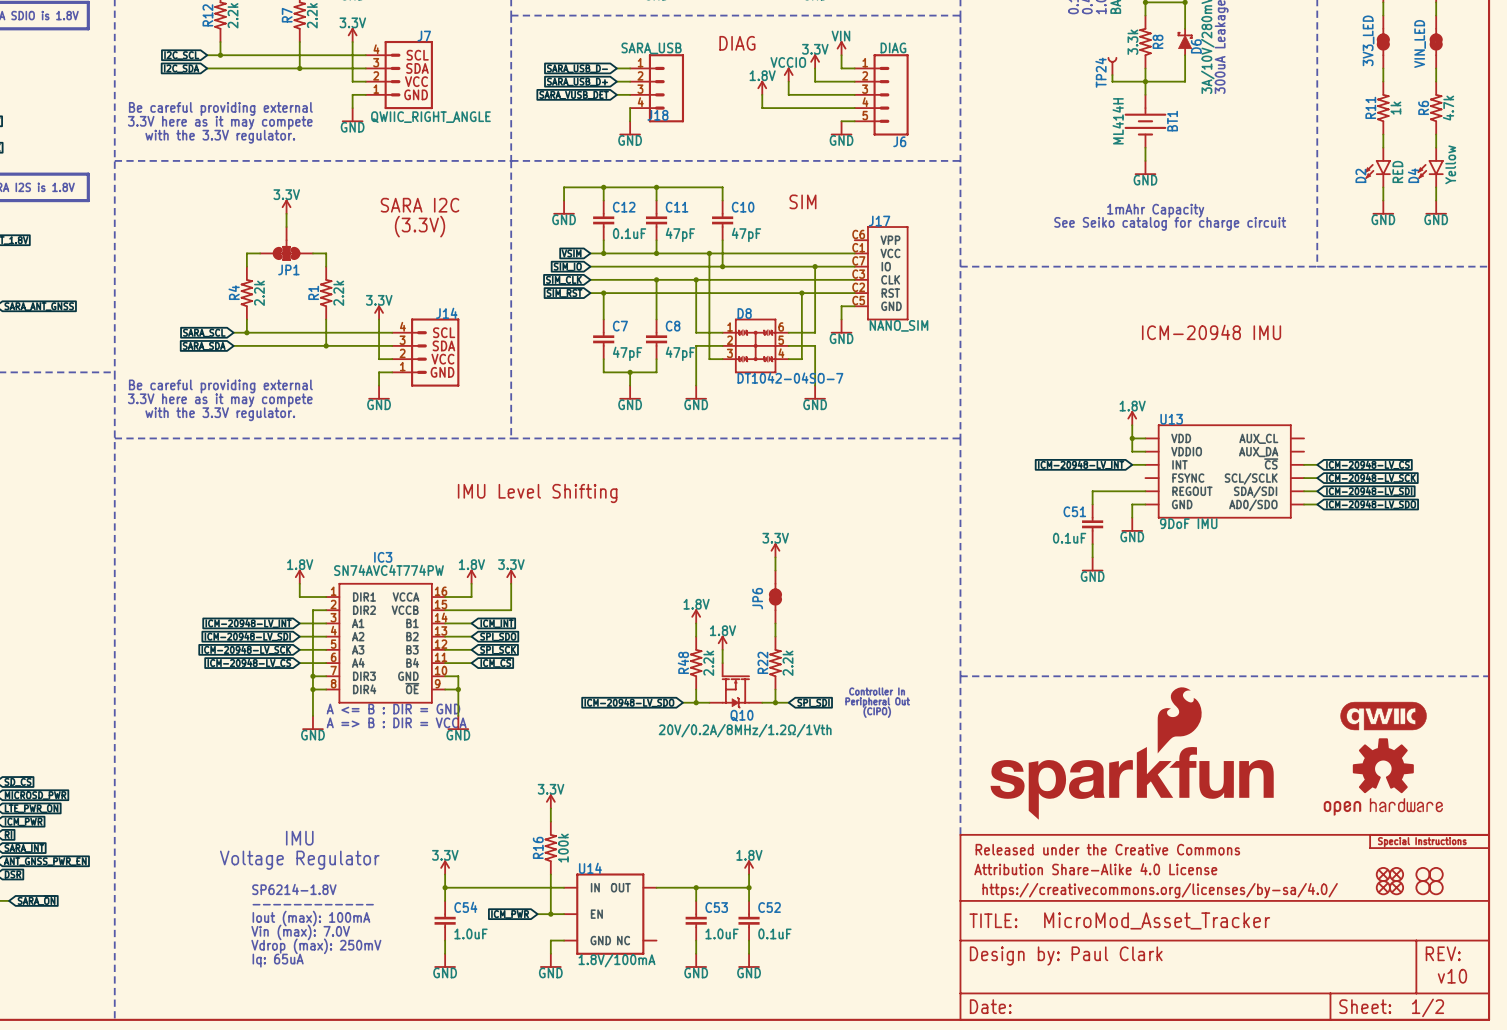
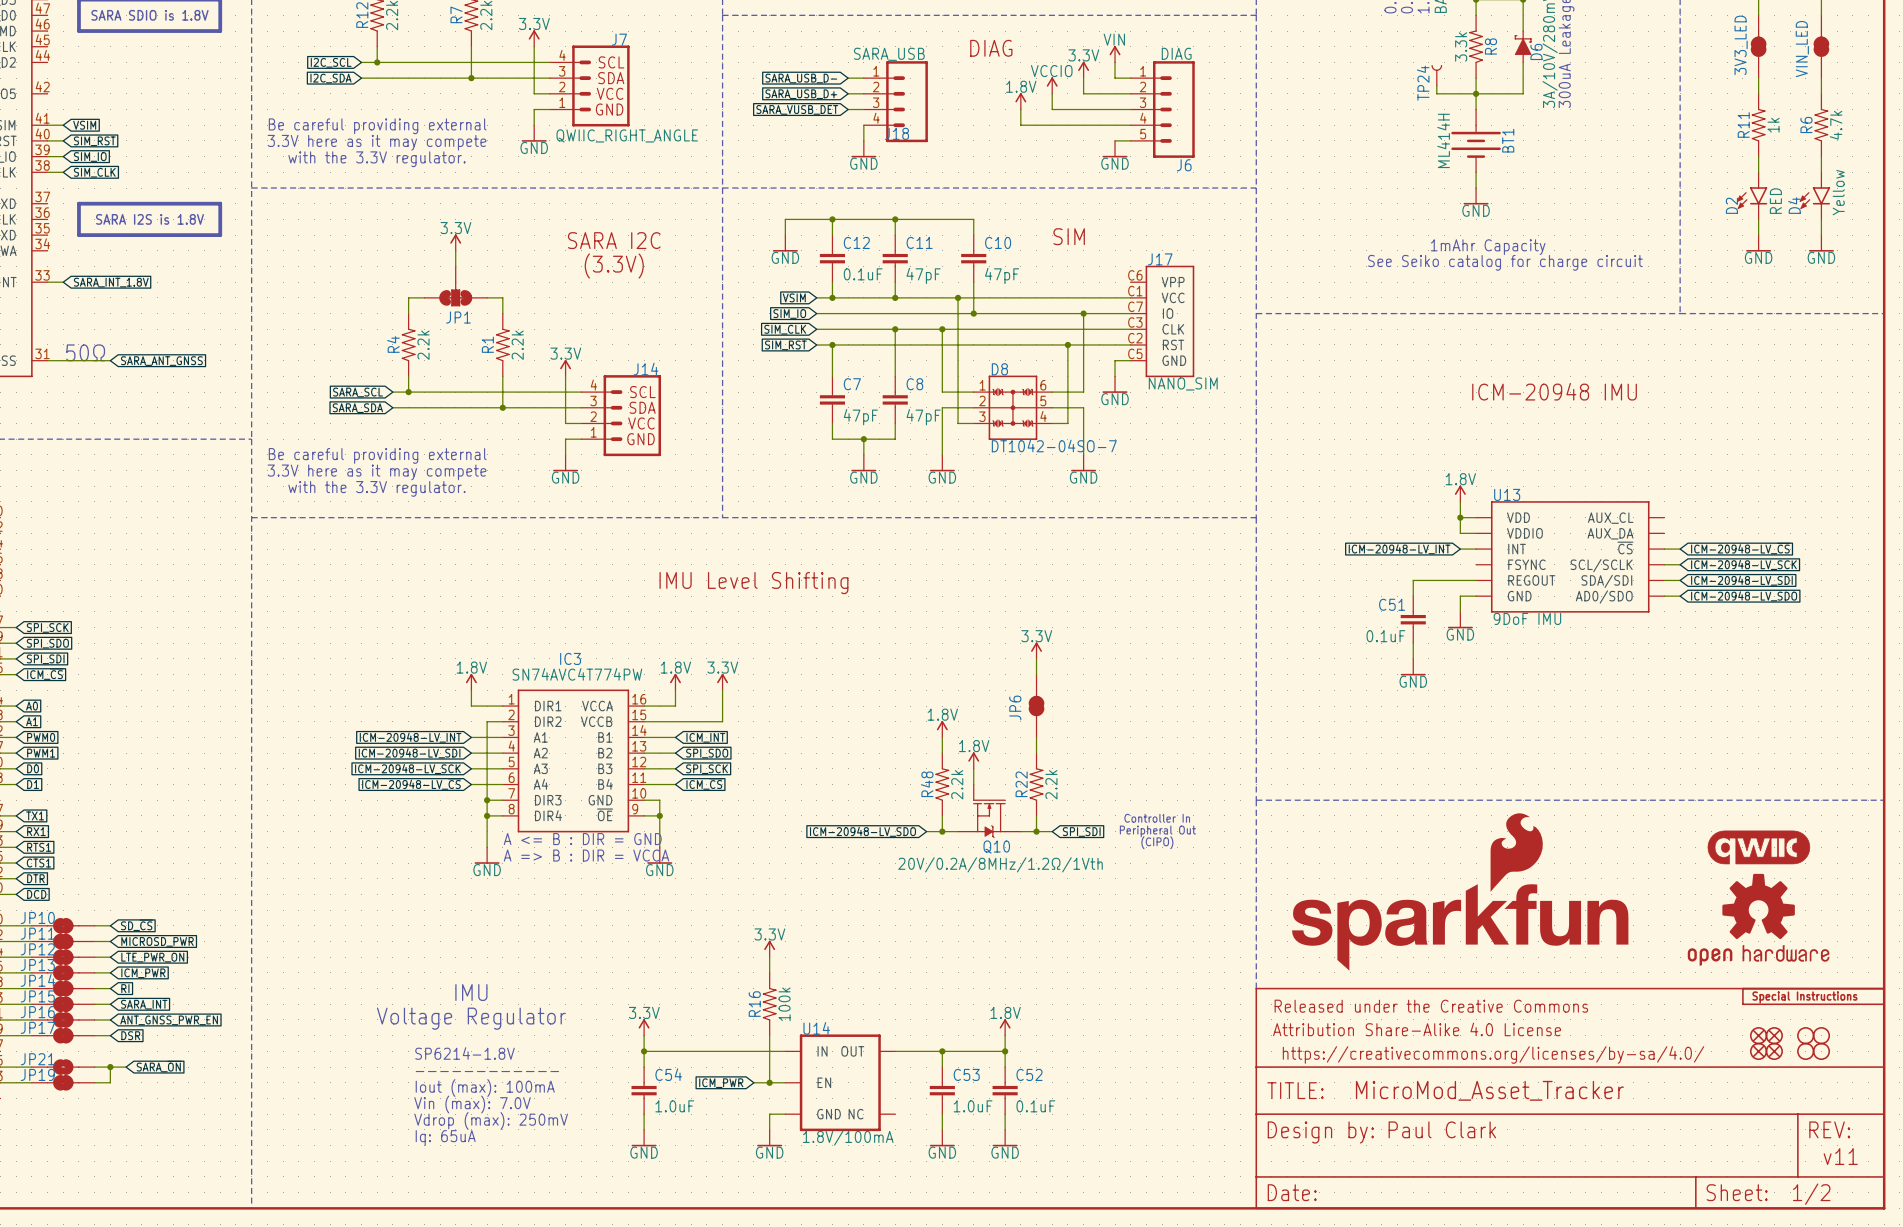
text: v10 (1452, 976) -> v11 (1840, 1156)

